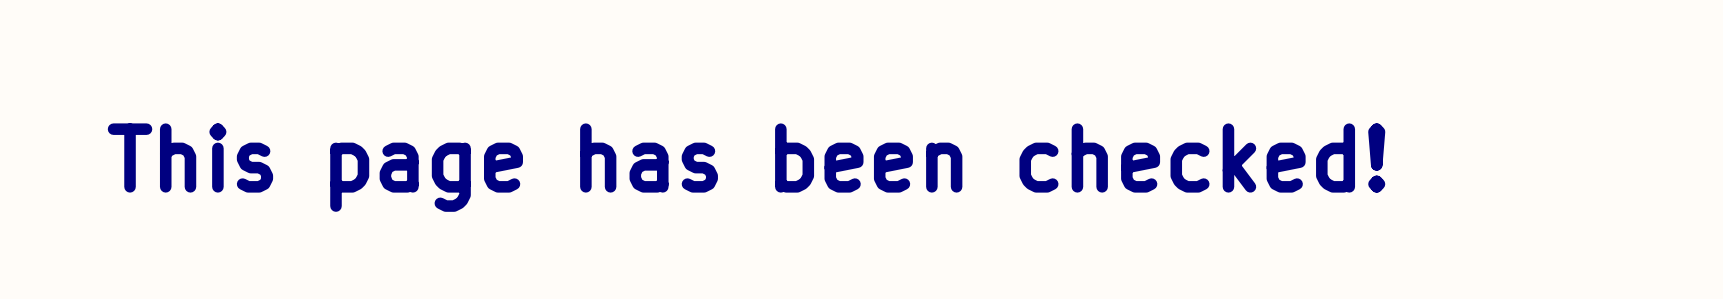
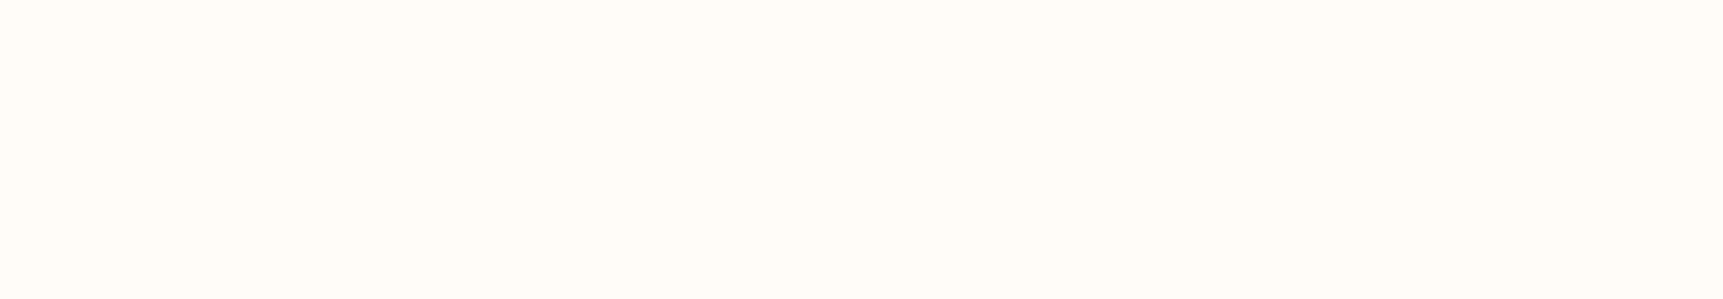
text: This page has been checked! (746, 167) -> none

